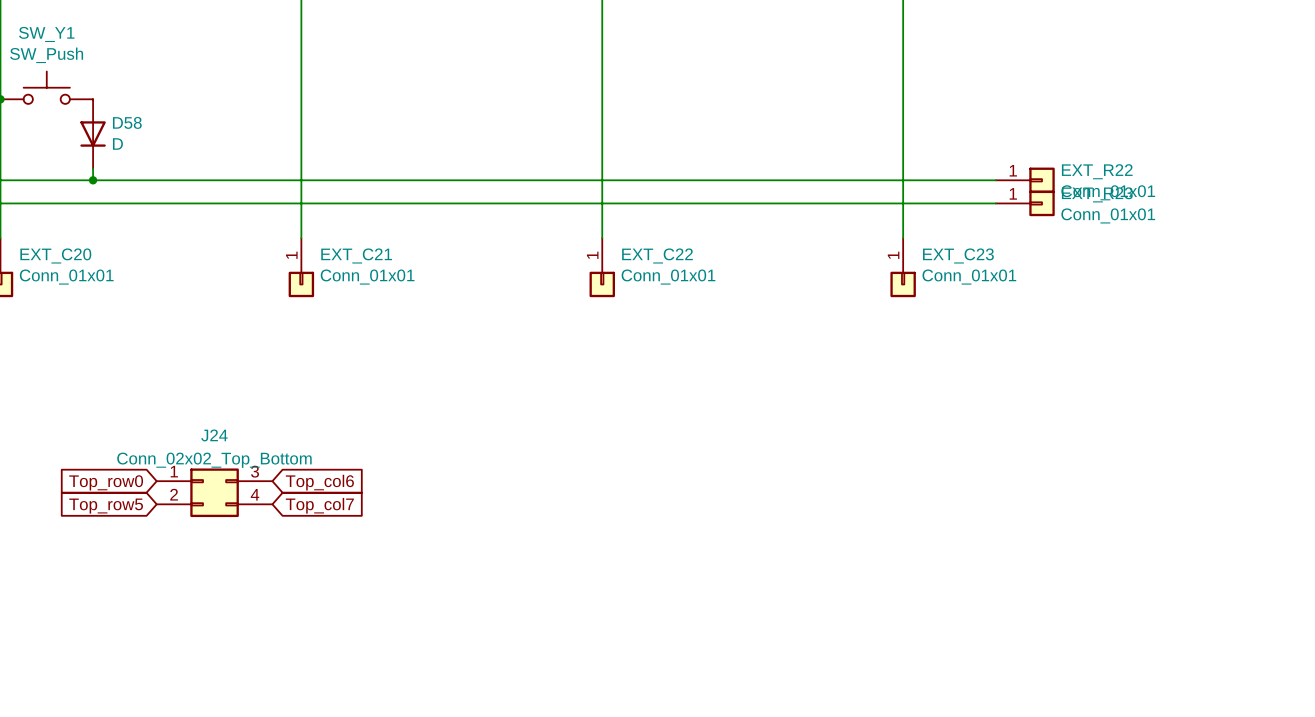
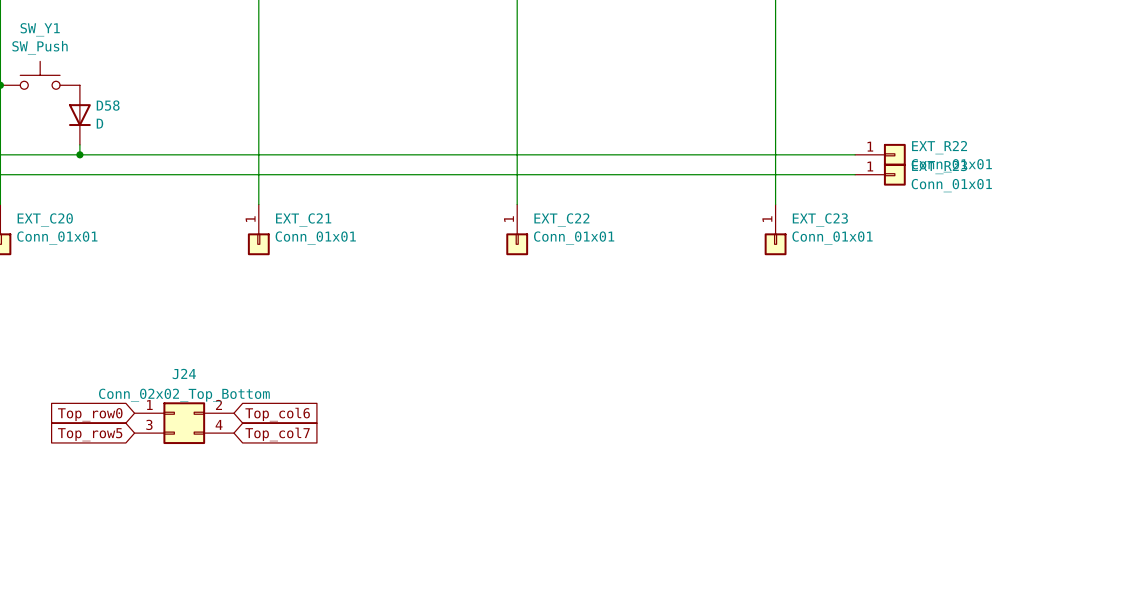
J24 pin number: 3 (255, 471) -> 2 (218, 404)
J24 pin number: 2 (174, 494) -> 3 (149, 424)

